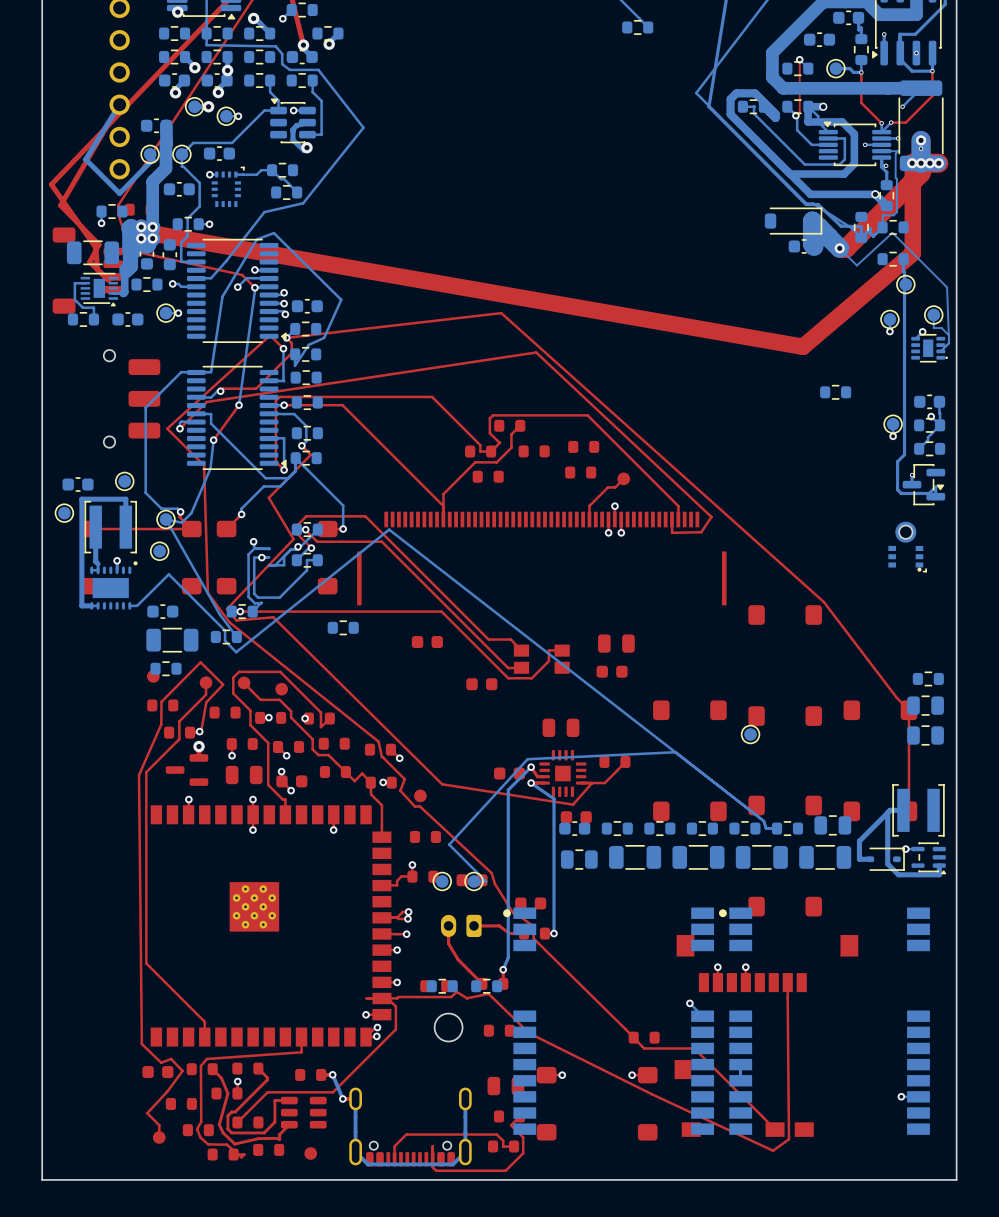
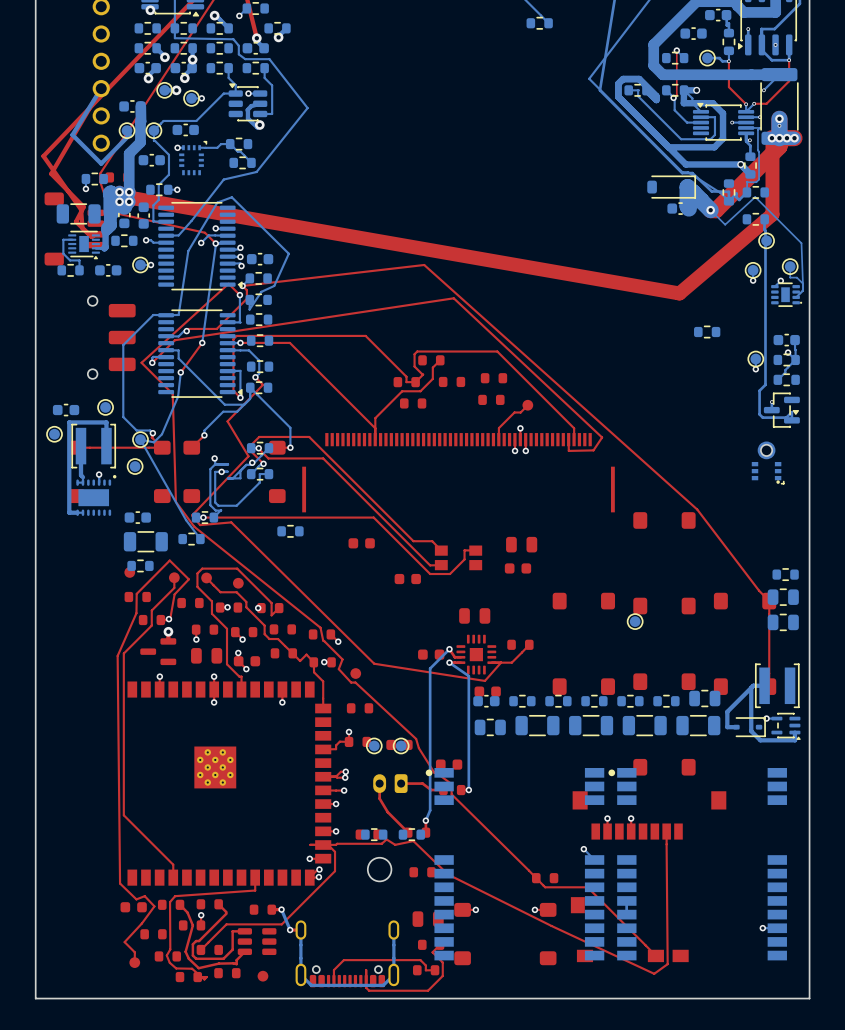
bottom track: (129, 605) (137, 605) (168, 574) (225, 630) (225, 640) (236, 652) (389, 529) (763, 821) -> none
bottom track: (763, 821) (766, 828) (777, 828) -> none
bottom track: (763, 821) (675, 752) (527, 759) (449, 844) (486, 881) (473, 881) -> none

